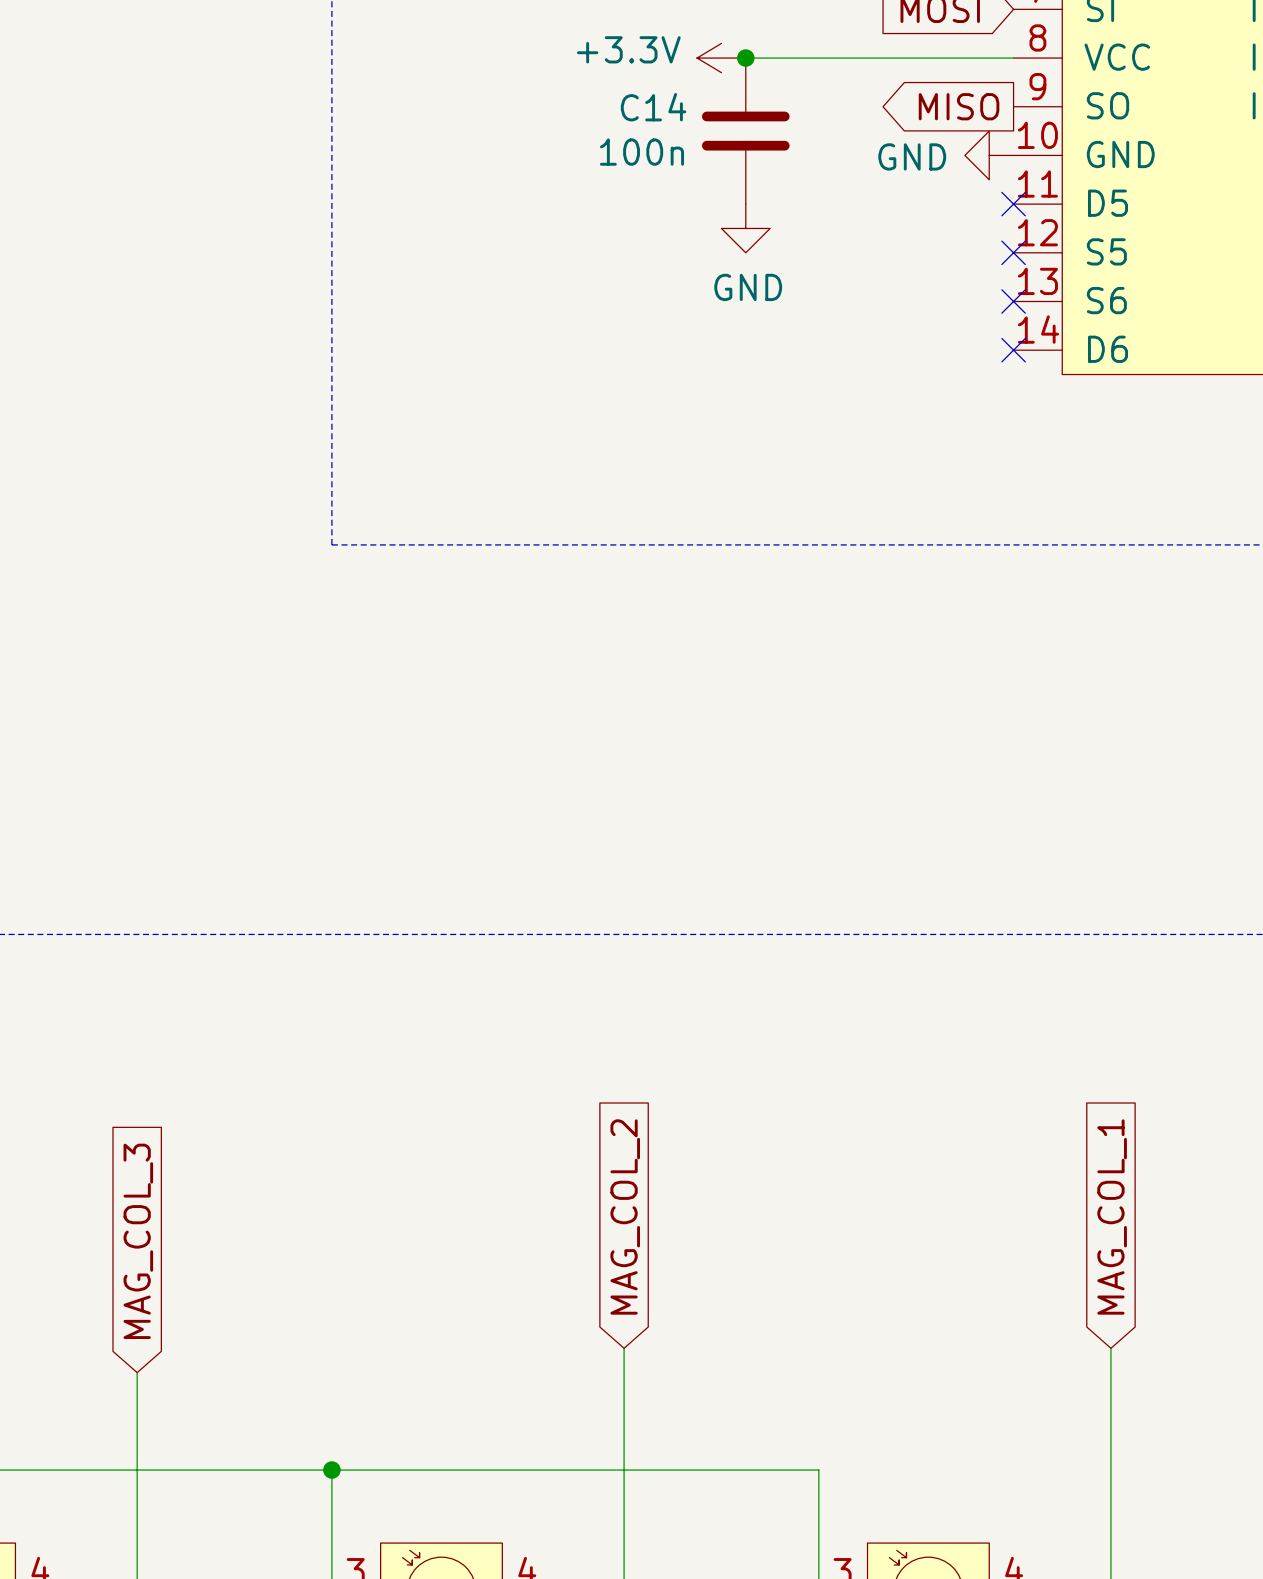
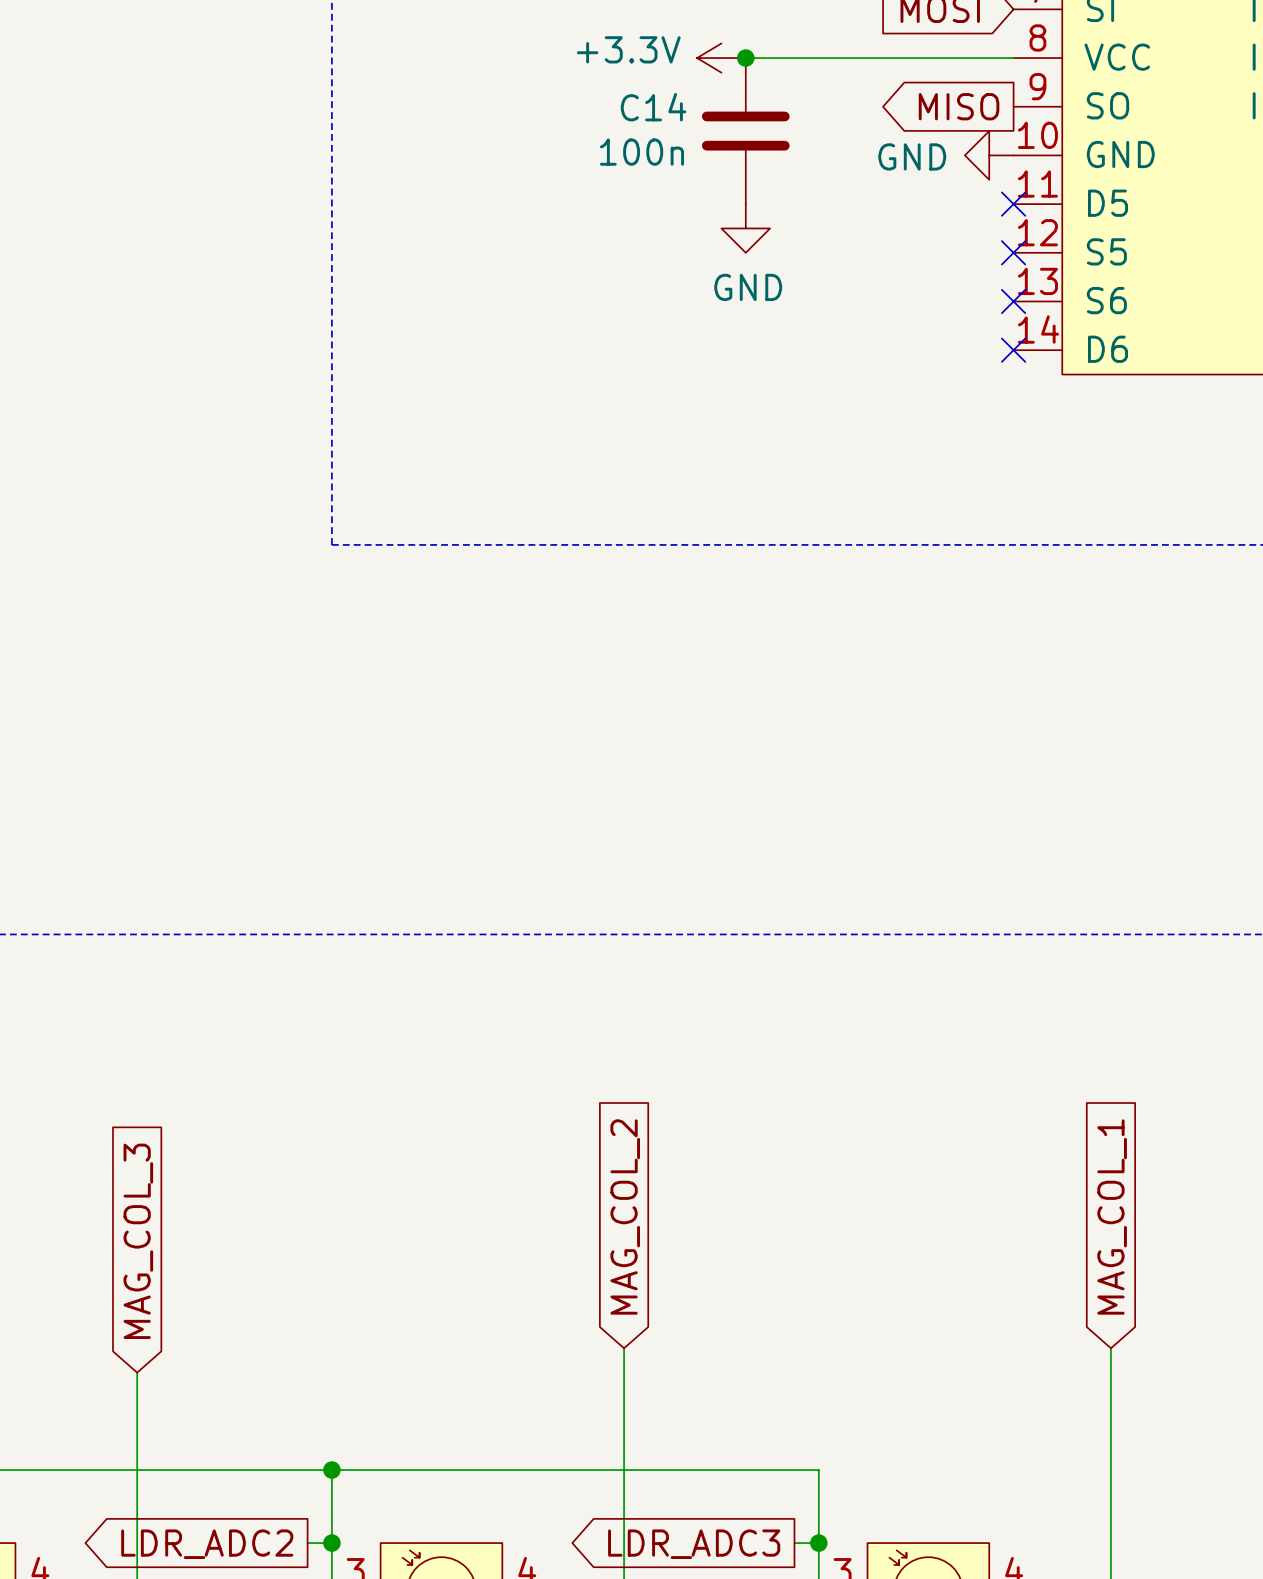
wire: none -> (307, 1543) (331, 1543)
junction: none -> (331, 1543)
wire: none -> (794, 1543) (818, 1543)
junction: none -> (818, 1543)
global label: none -> LDR_ADC2 (207, 1544)
global label: none -> LDR_ADC3 (694, 1544)

